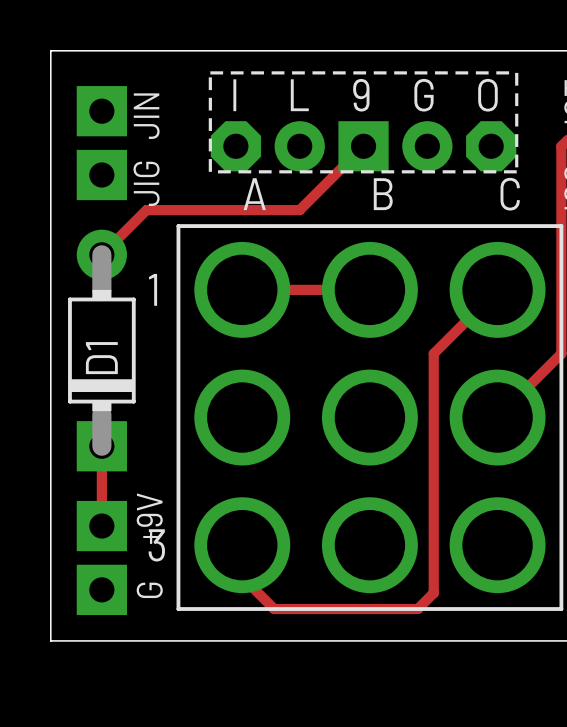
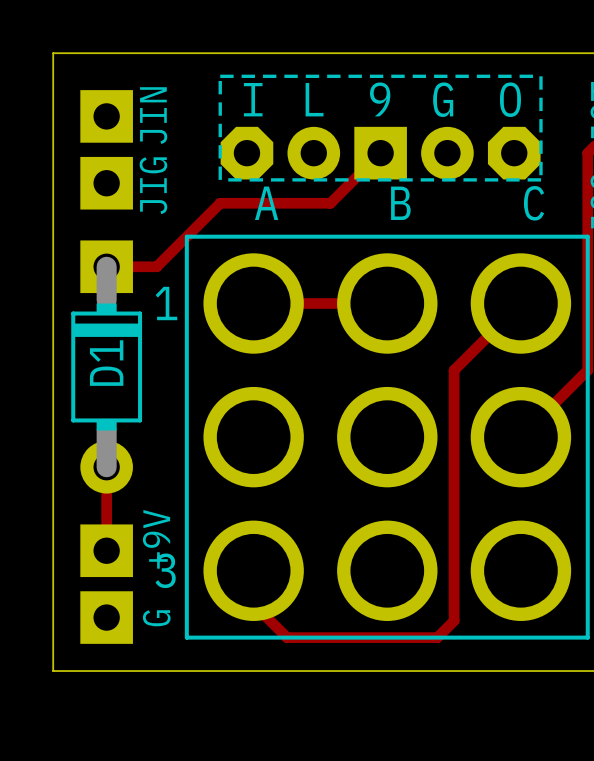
track: (315, 194) (299, 210) (146, 210) (101, 254) -> (330, 203) (220, 203) (156, 266) (106, 266)
D1 rotation: 0° (101, 350) -> 180° (106, 366)

